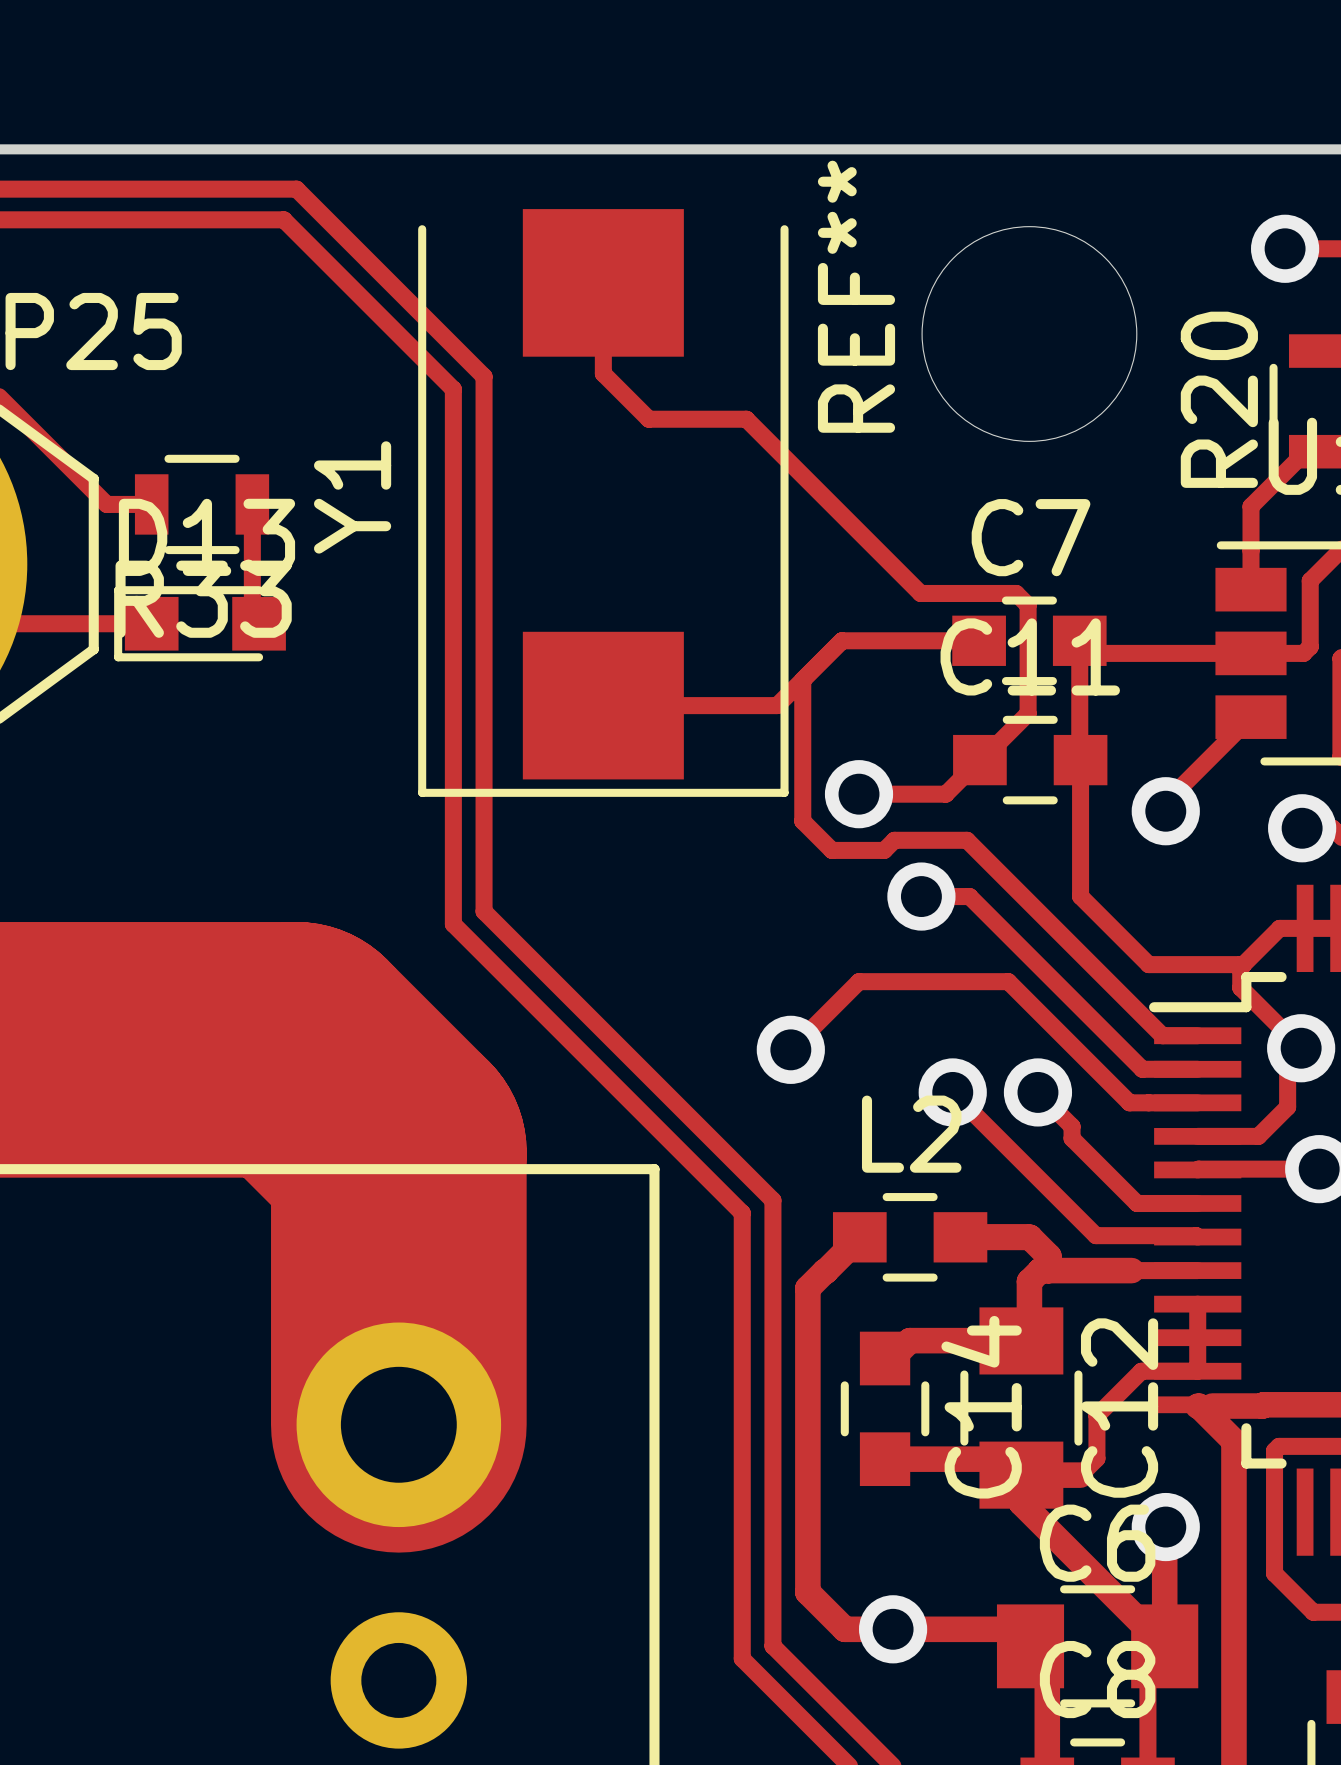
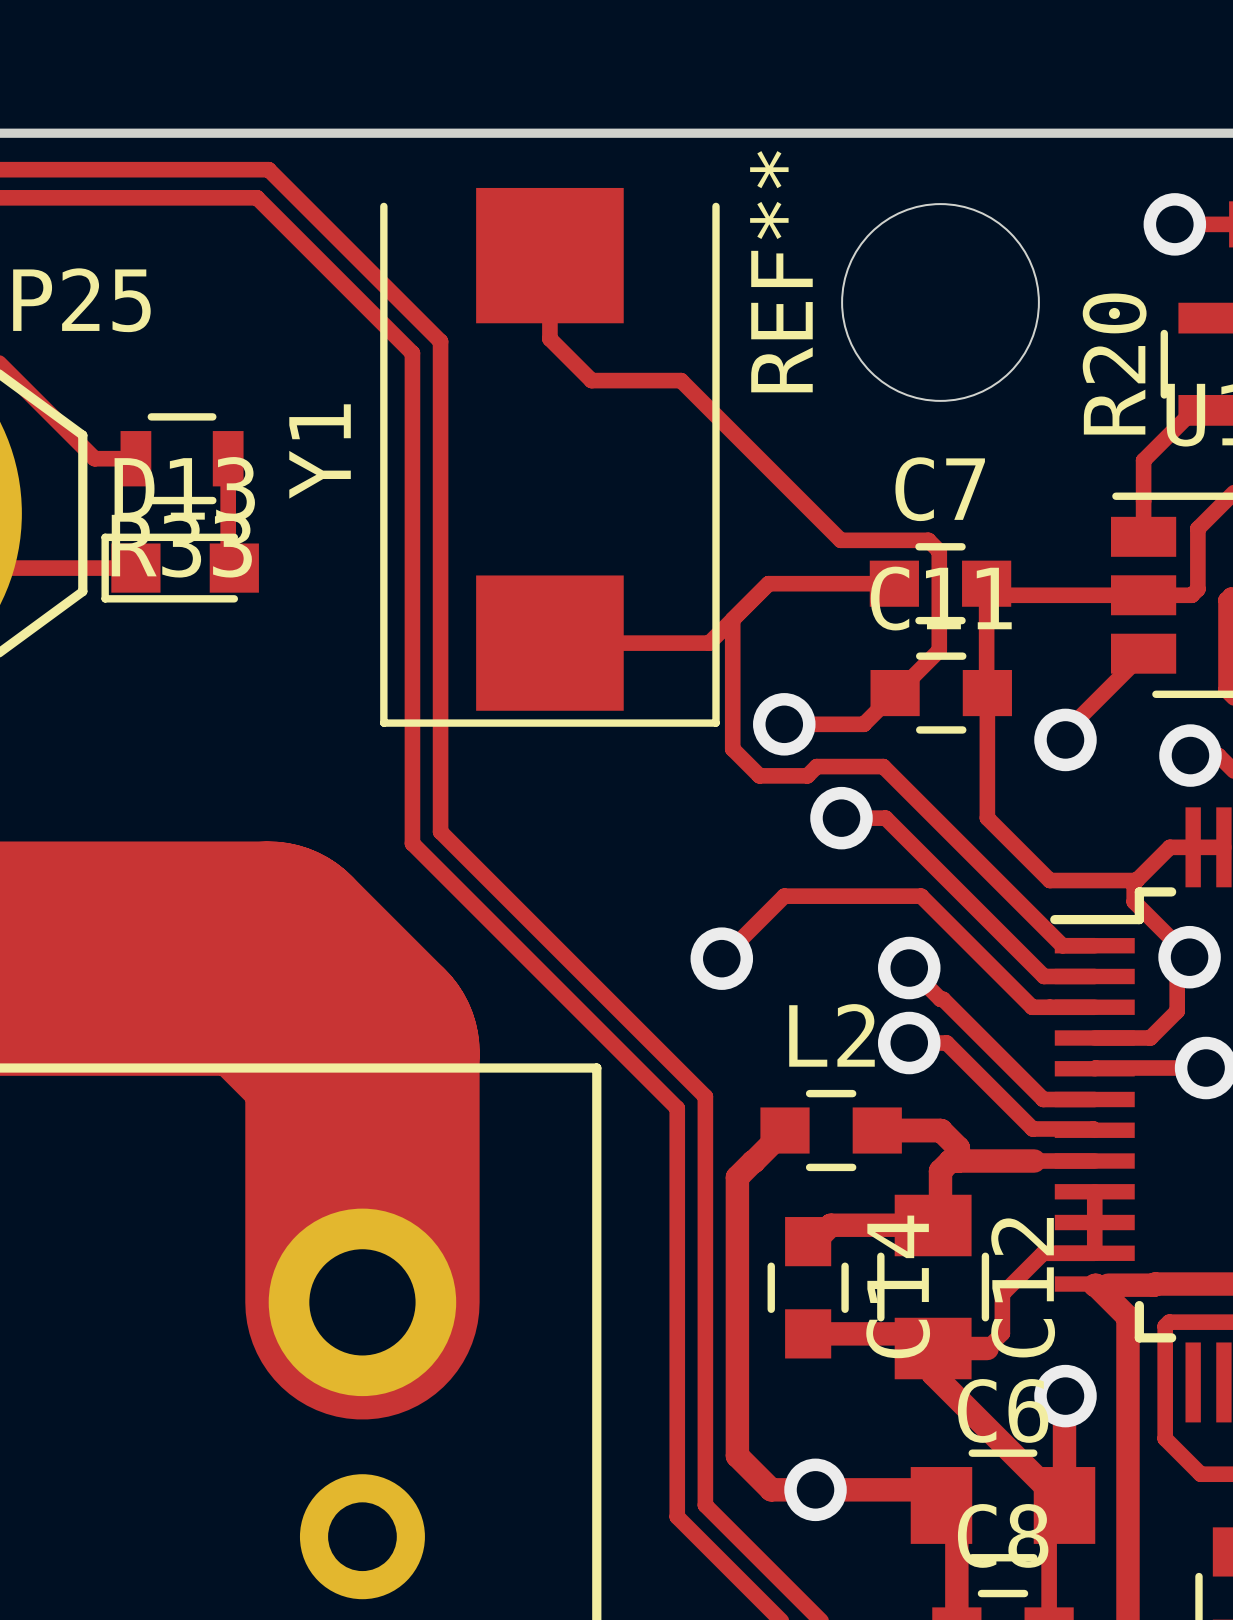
via: none -> (909, 968)
track: (952, 1092) (1095, 1235) (1130, 1235) -> (909, 1043) (946, 1043) (1032, 1128)
via: (952, 1092) -> none
track: (1037, 1092) (1072, 1126) (1072, 1138) (1137, 1203) (1141, 1203) -> (909, 968) (1043, 1099)
via: (1037, 1092) -> none
via: none -> (909, 1043)

